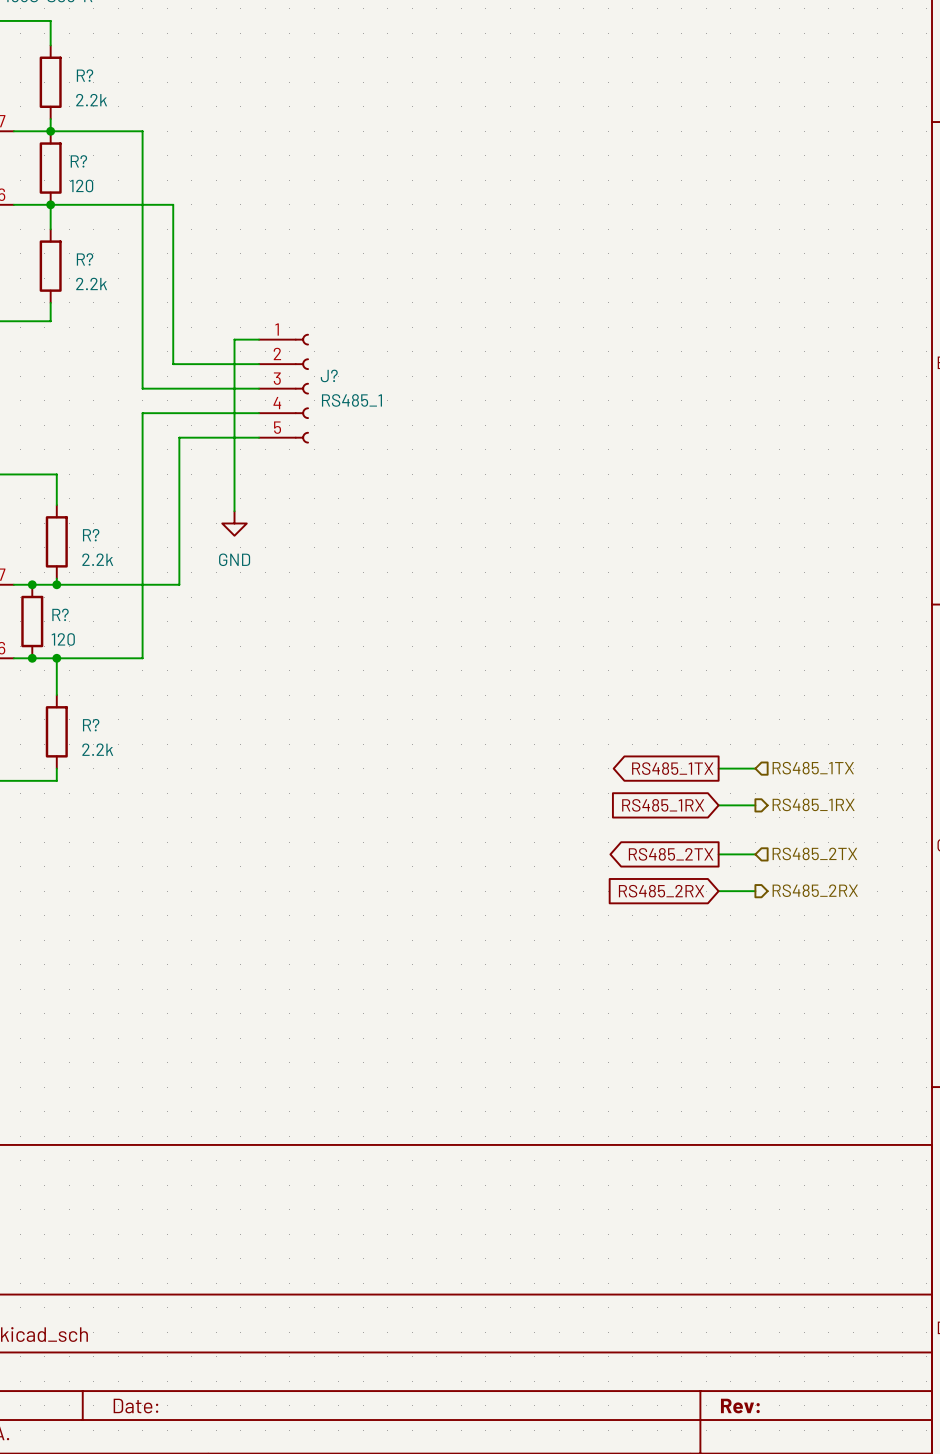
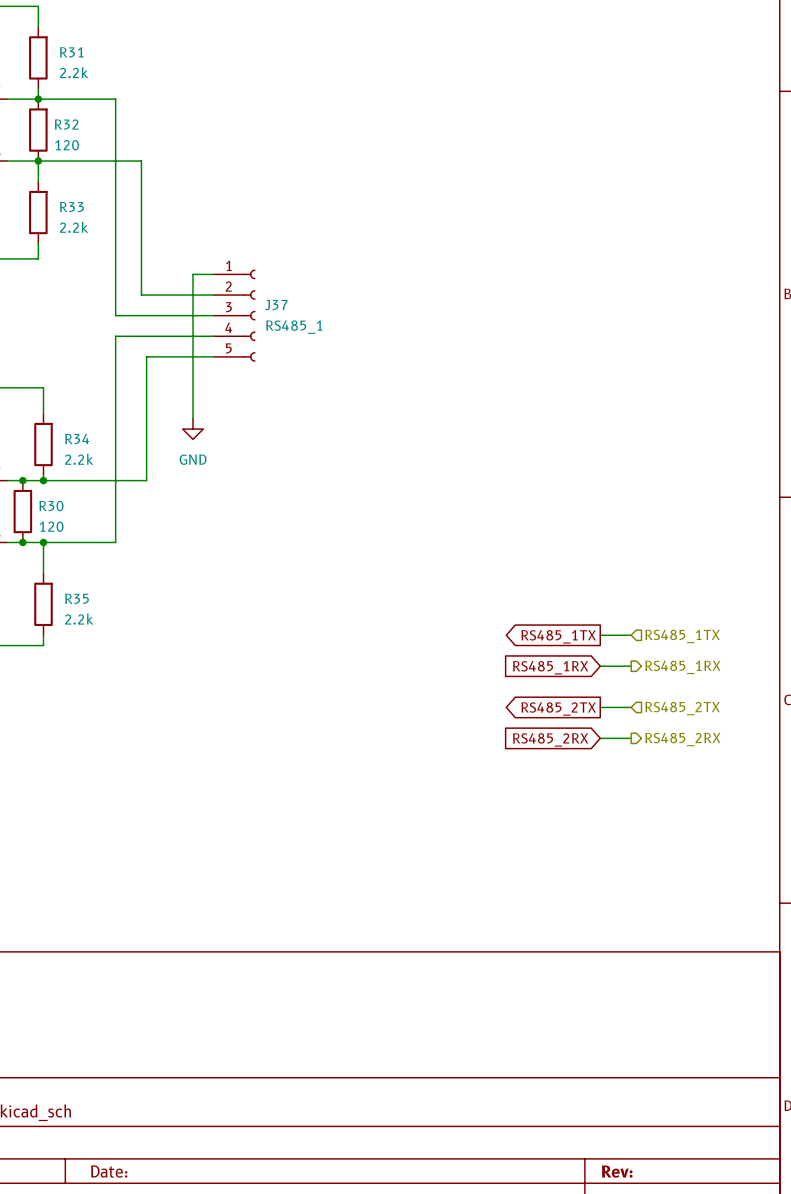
R? name: R? (85, 75) -> R31 (71, 52)
R? name: R? (78, 161) -> R32 (66, 124)
R? name: R? (85, 259) -> R33 (71, 207)
J? name: J? (329, 375) -> J37 (276, 305)
R? name: R? (91, 535) -> R34 (77, 438)
R? name: R? (60, 614) -> R30 (51, 506)
R? name: R? (91, 725) -> R35 (77, 598)

